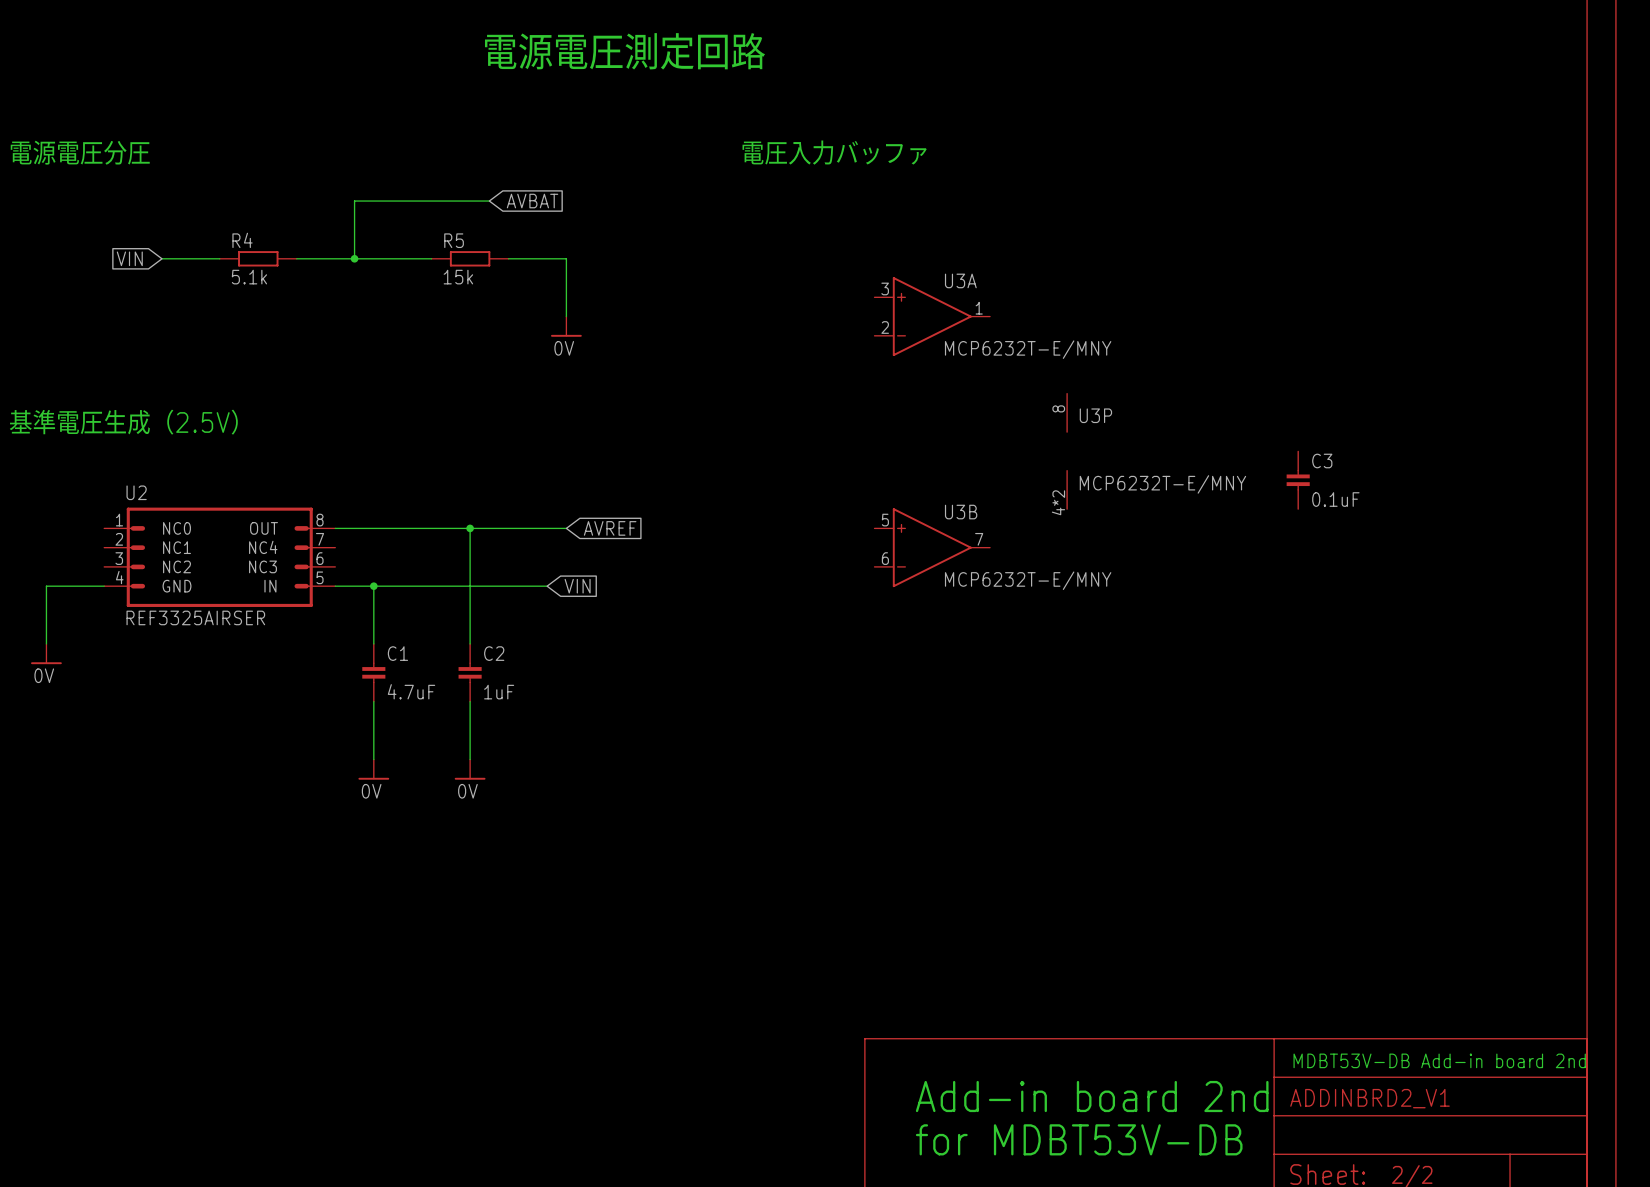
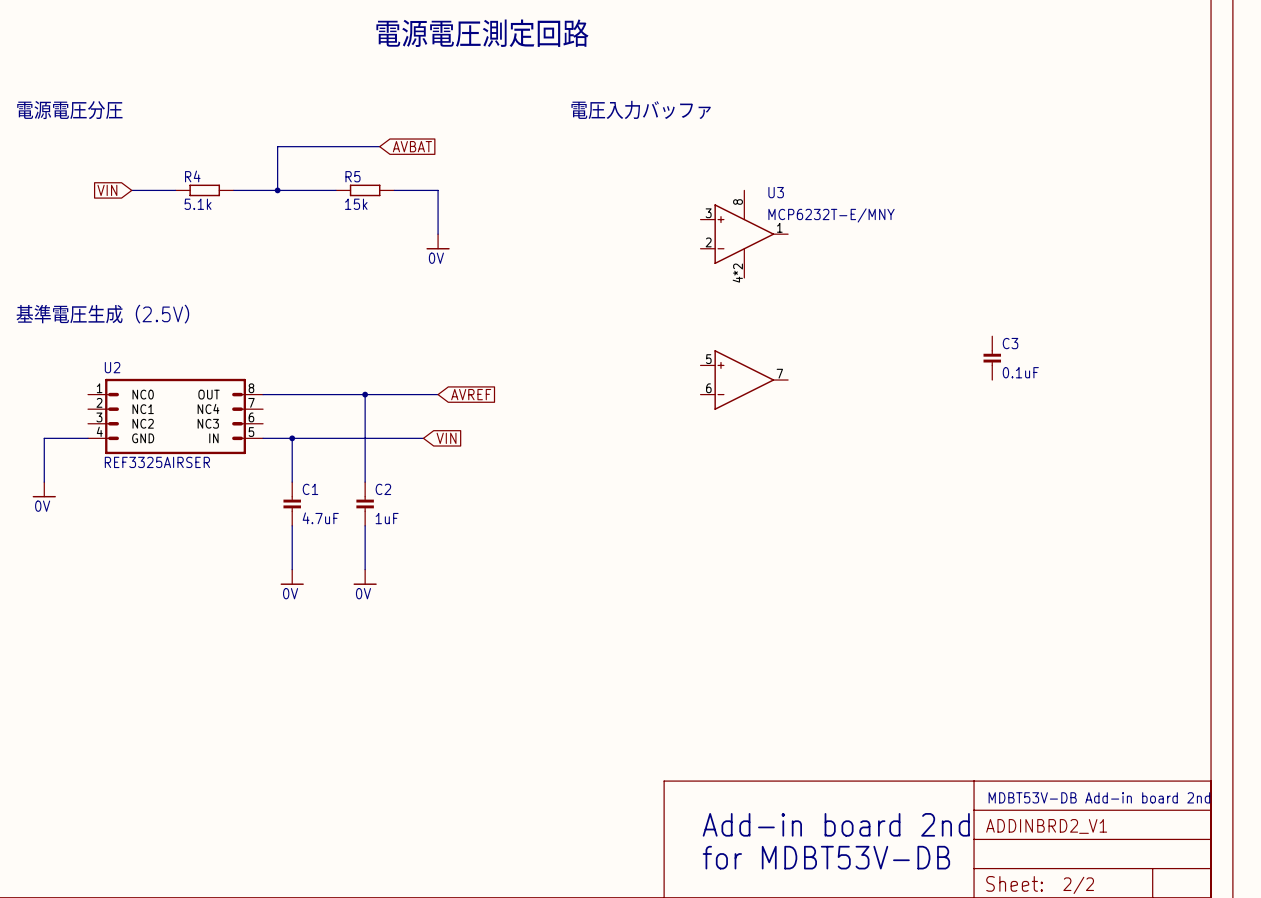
U3A: MCP6232T-E/MNY (932, 316) -> none
U3: none -> MCP6232T-E/MNY (744, 300)
U3P: MCP6232T-E/MNY (1067, 451) -> none
U3B: MCP6232T-E/MNY (932, 547) -> none

